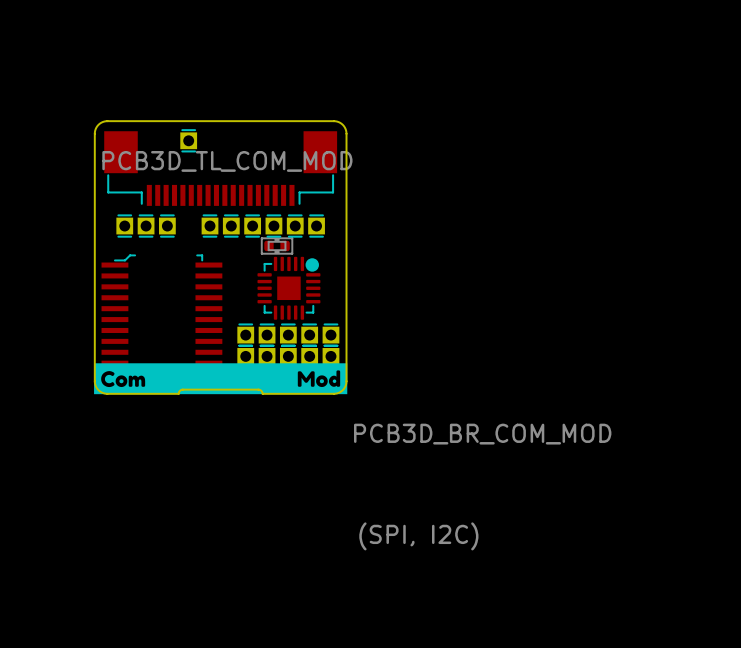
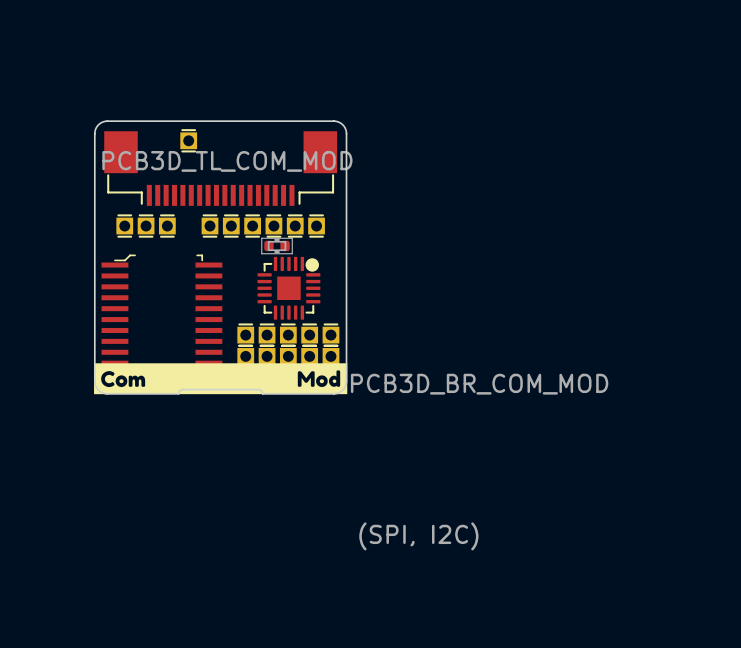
text position: PCB3D_BR_COM_MOD (482, 434) -> PCB3D_BR_COM_MOD (479, 384)

